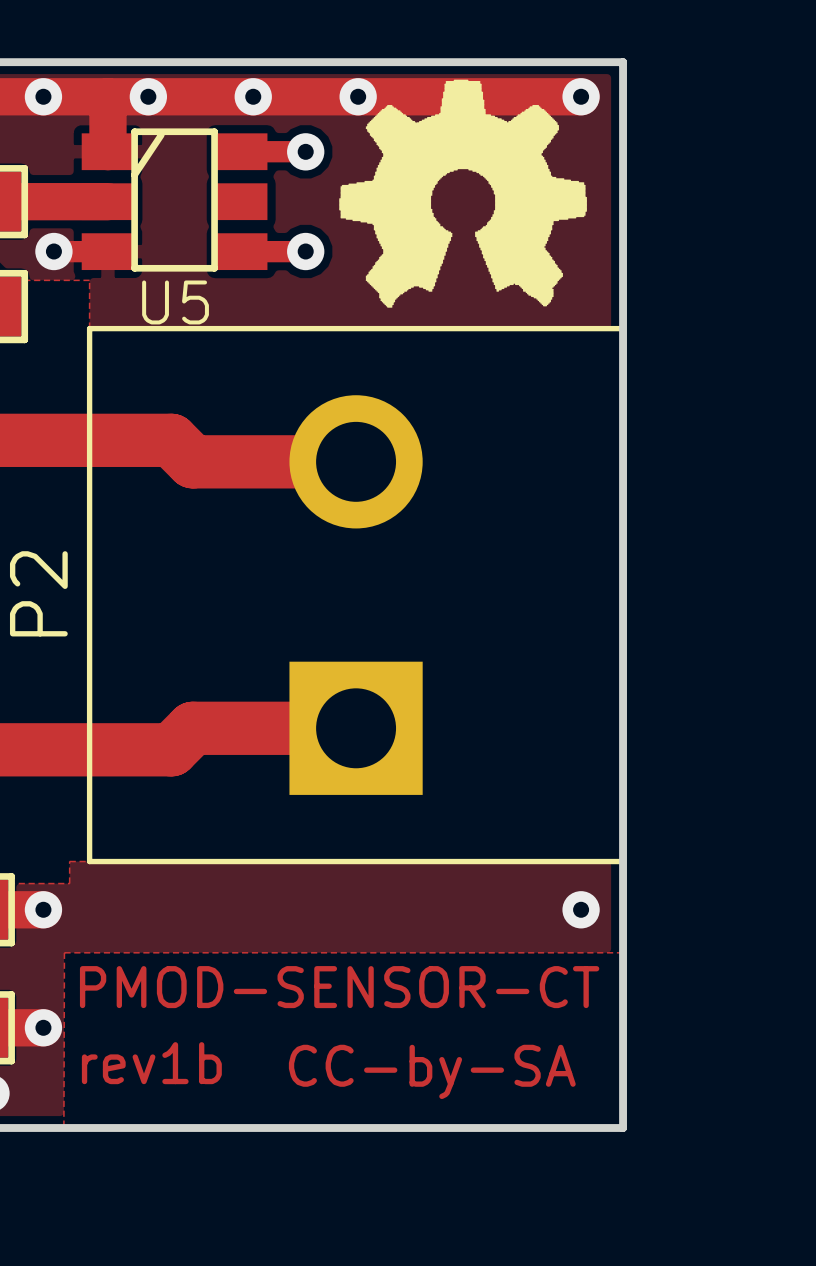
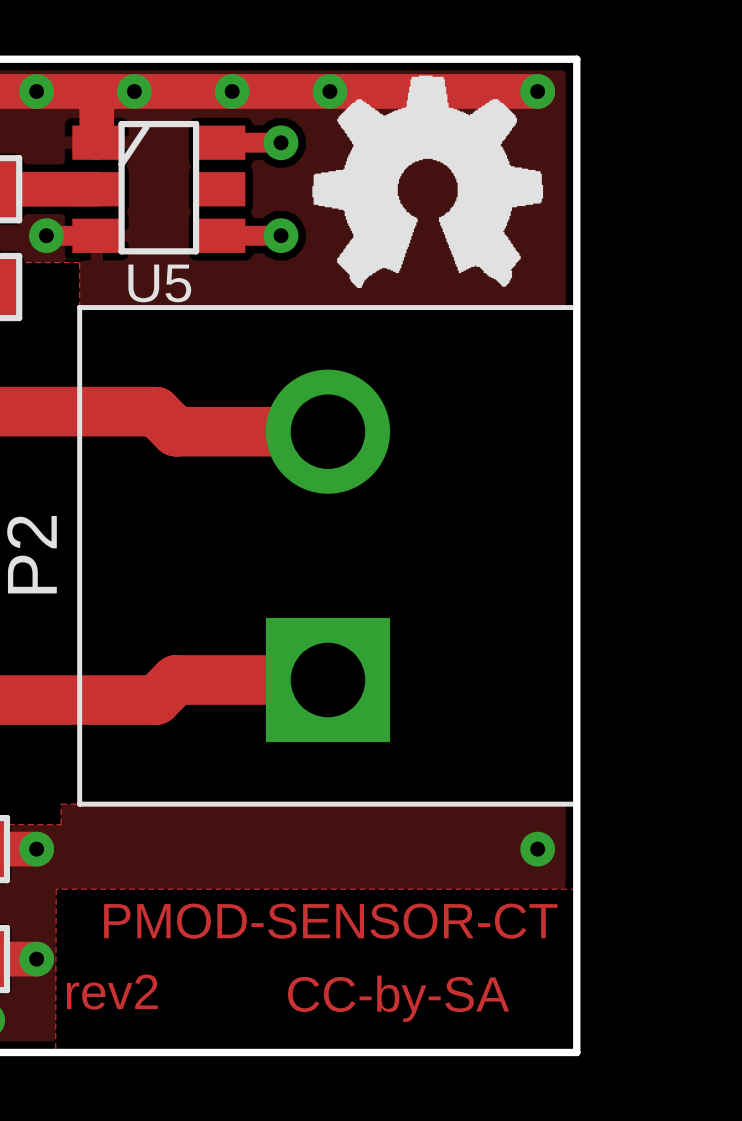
text: rev1b (151, 1063) -> rev2 (112, 992)

